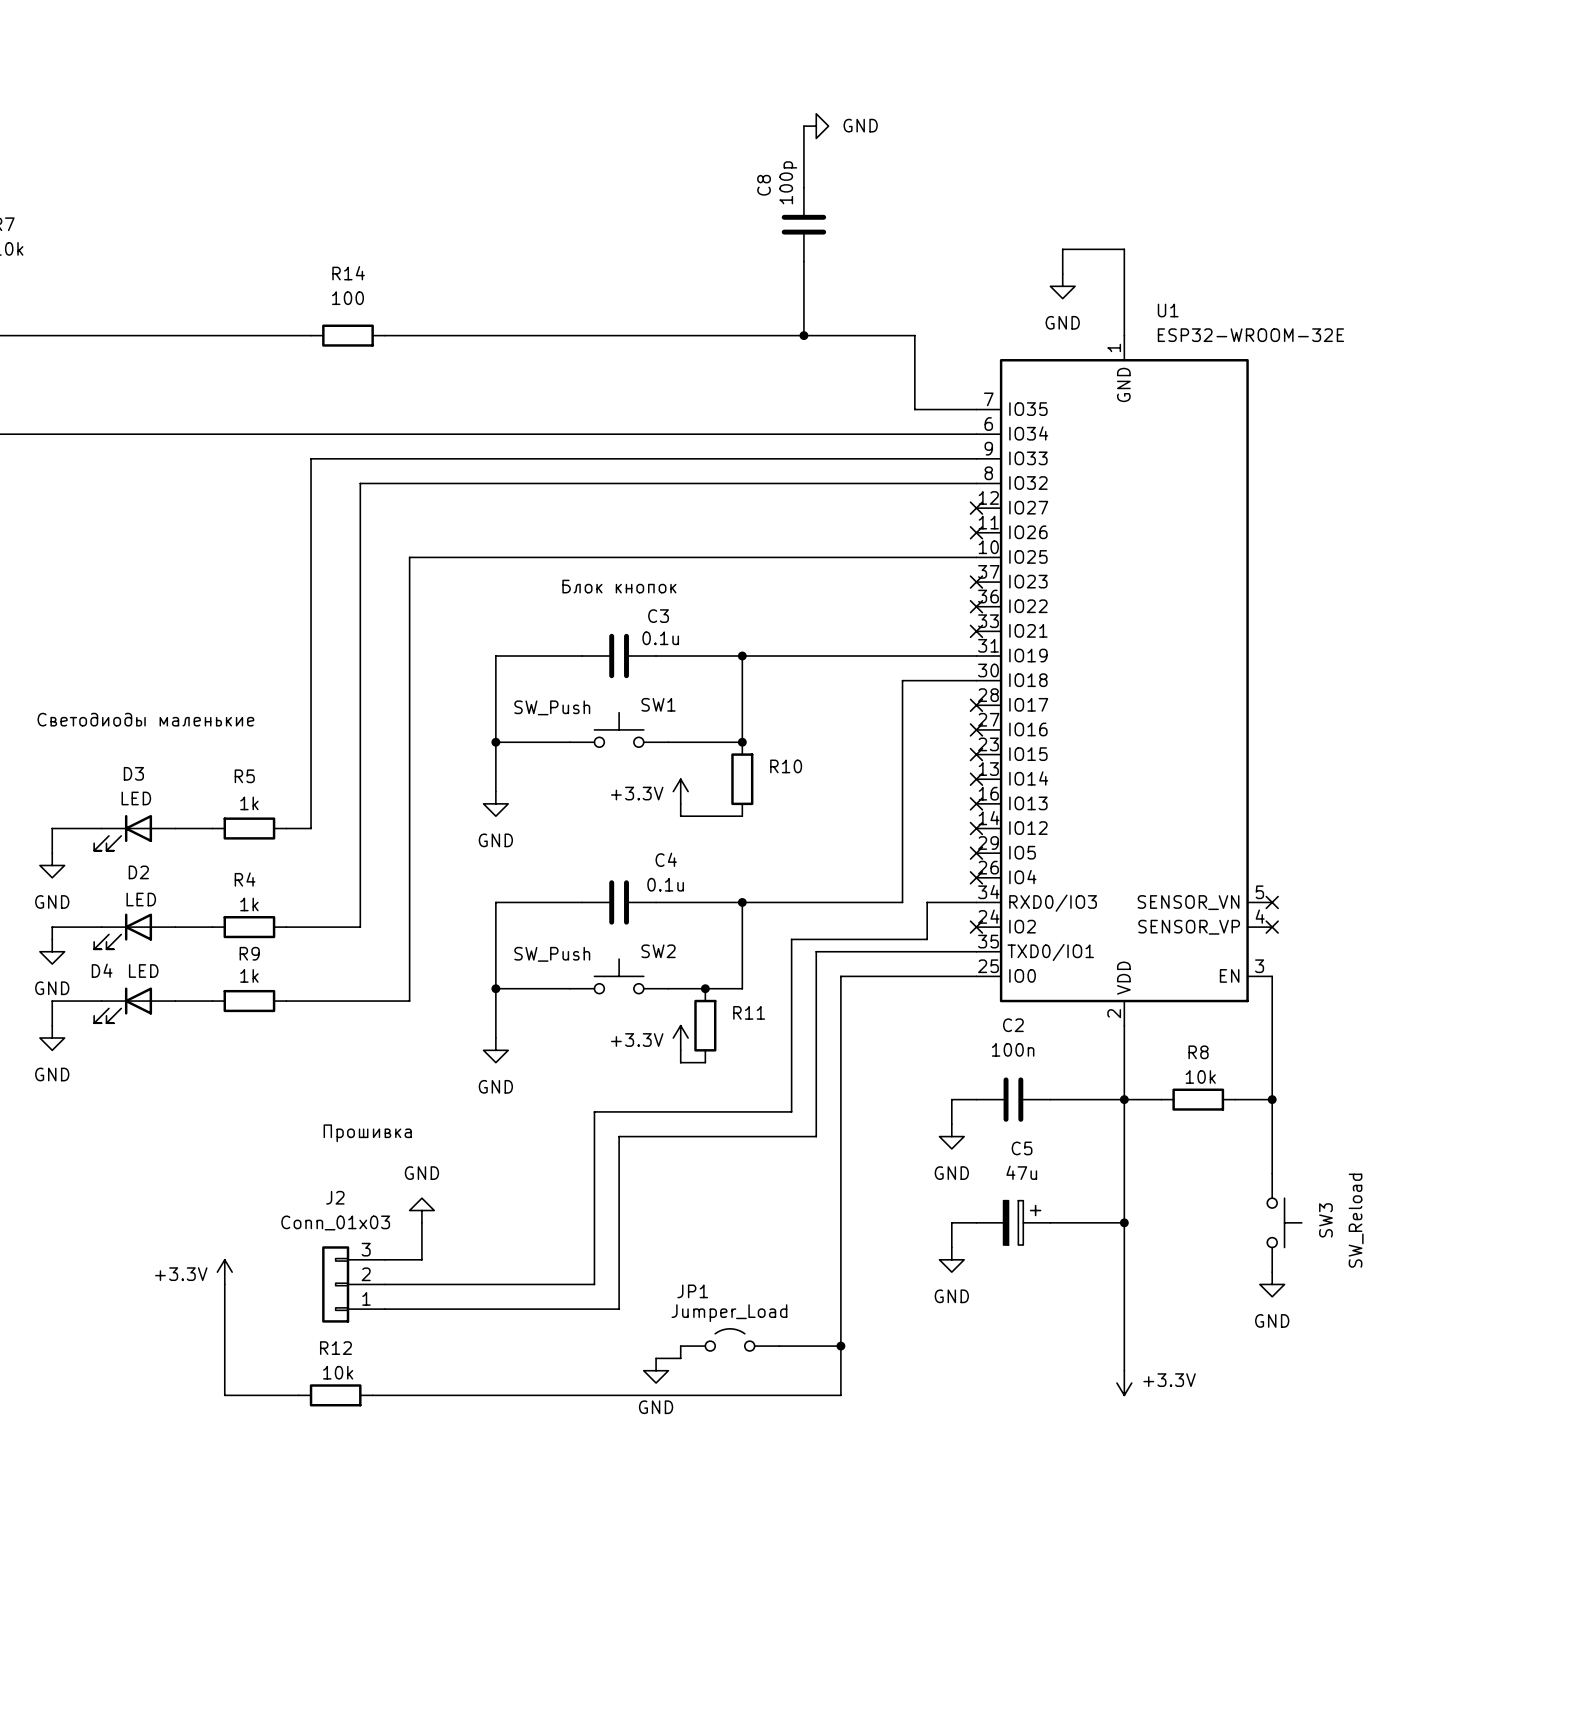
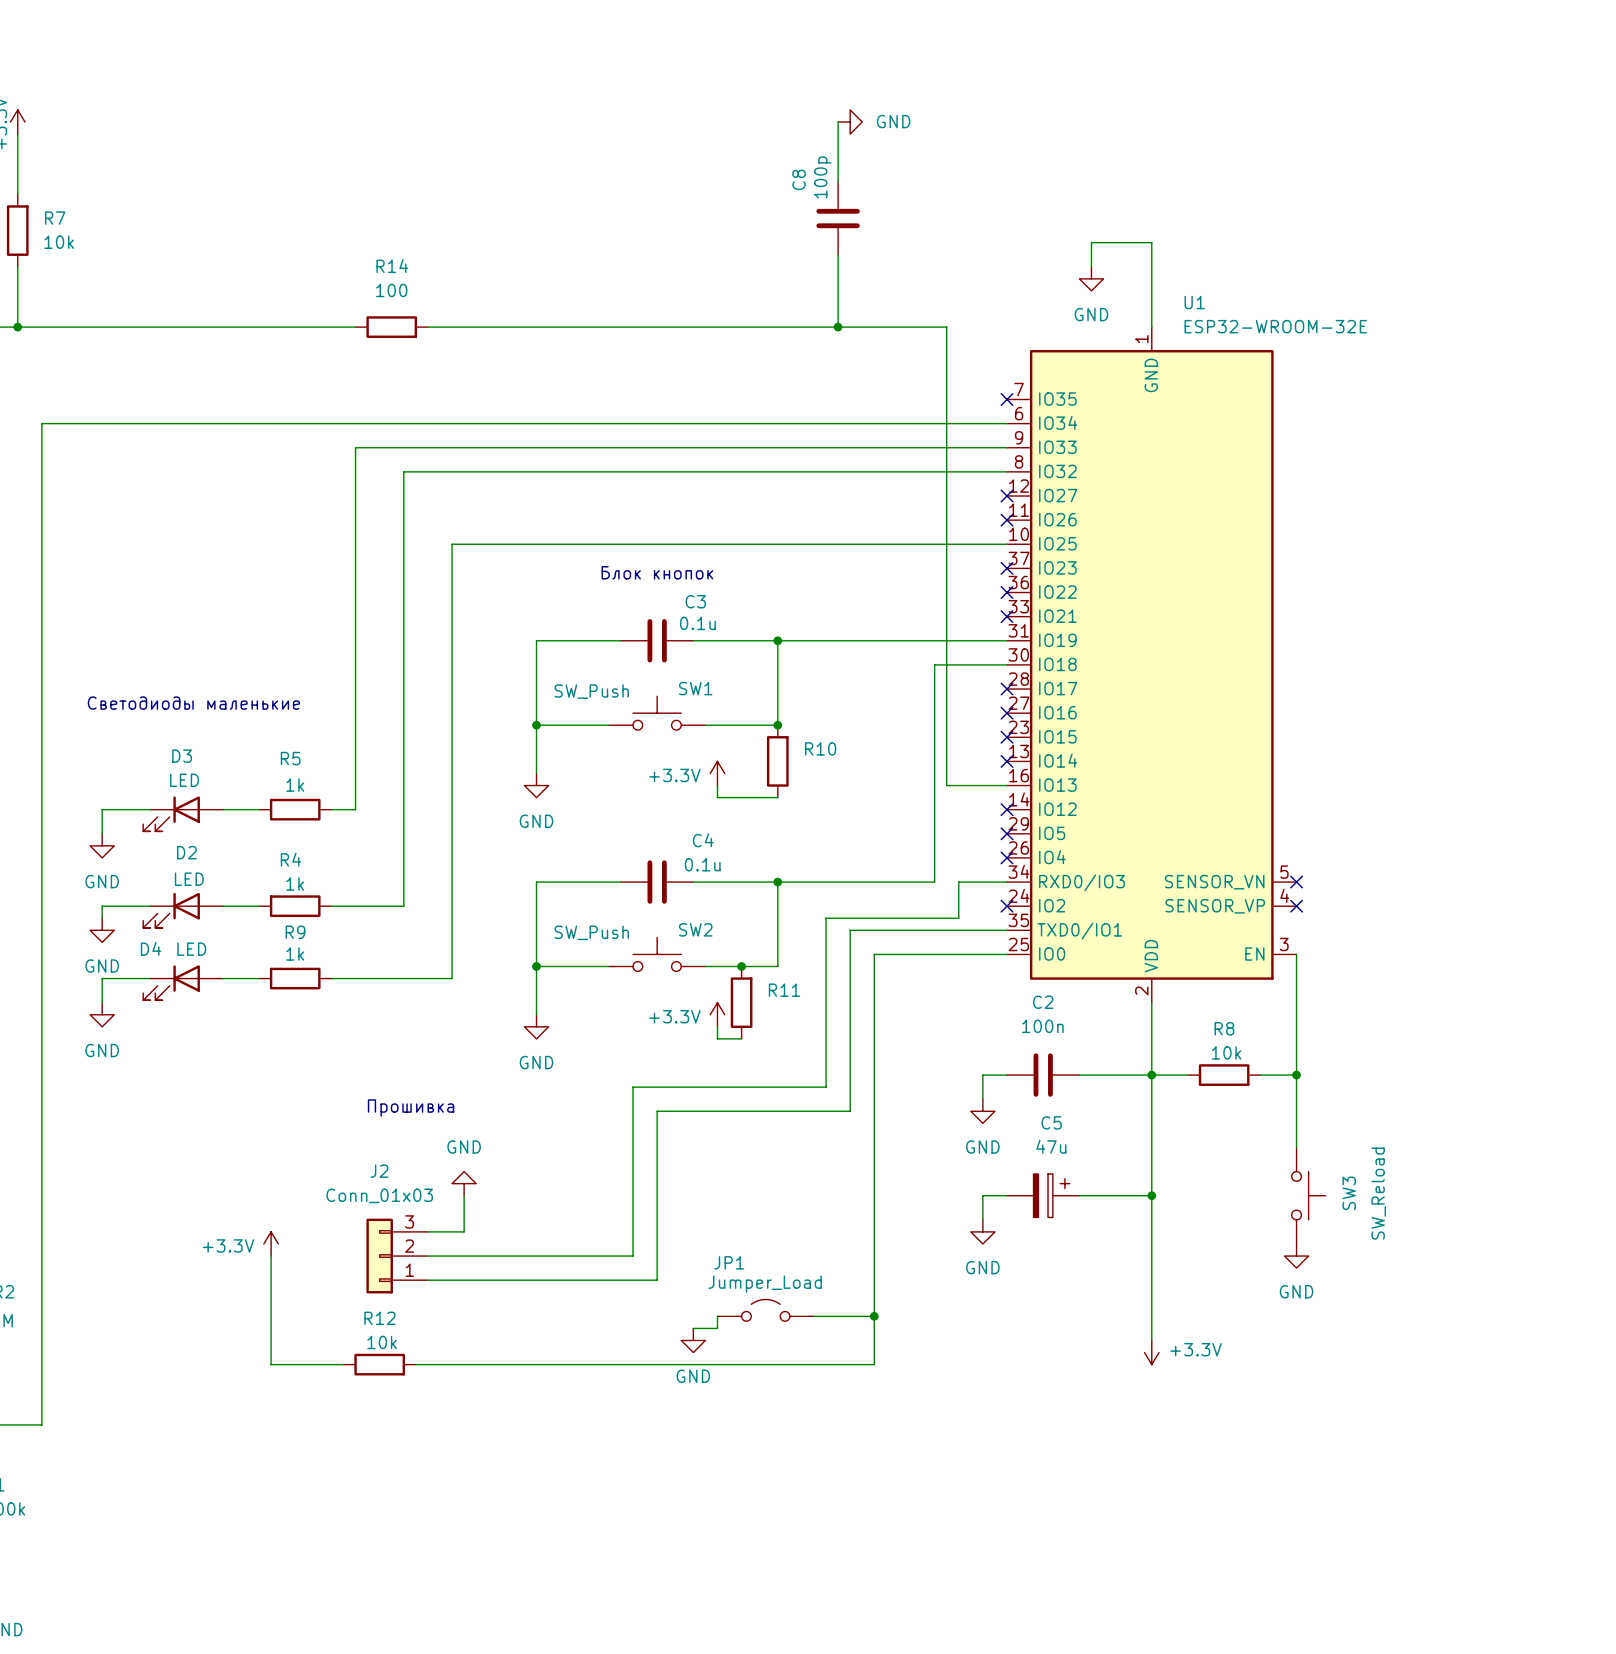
wire: (914, 409) (976, 409) -> (946, 399) (946, 785) (1007, 785)
no-connect mark: none -> (1007, 399)
no-connect mark: (976, 803) -> none

